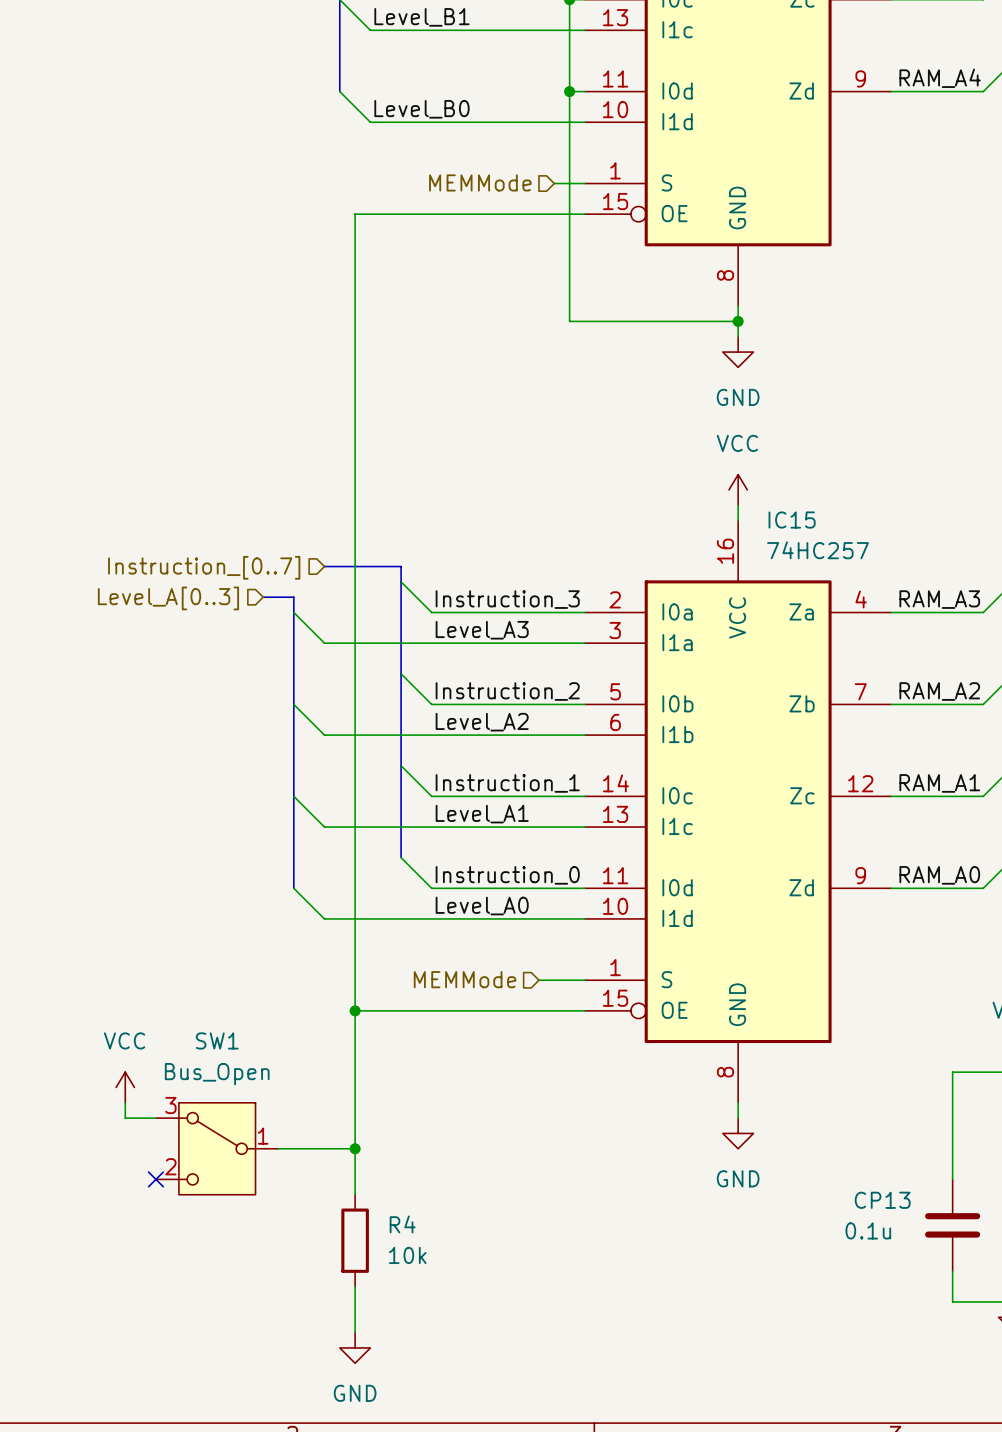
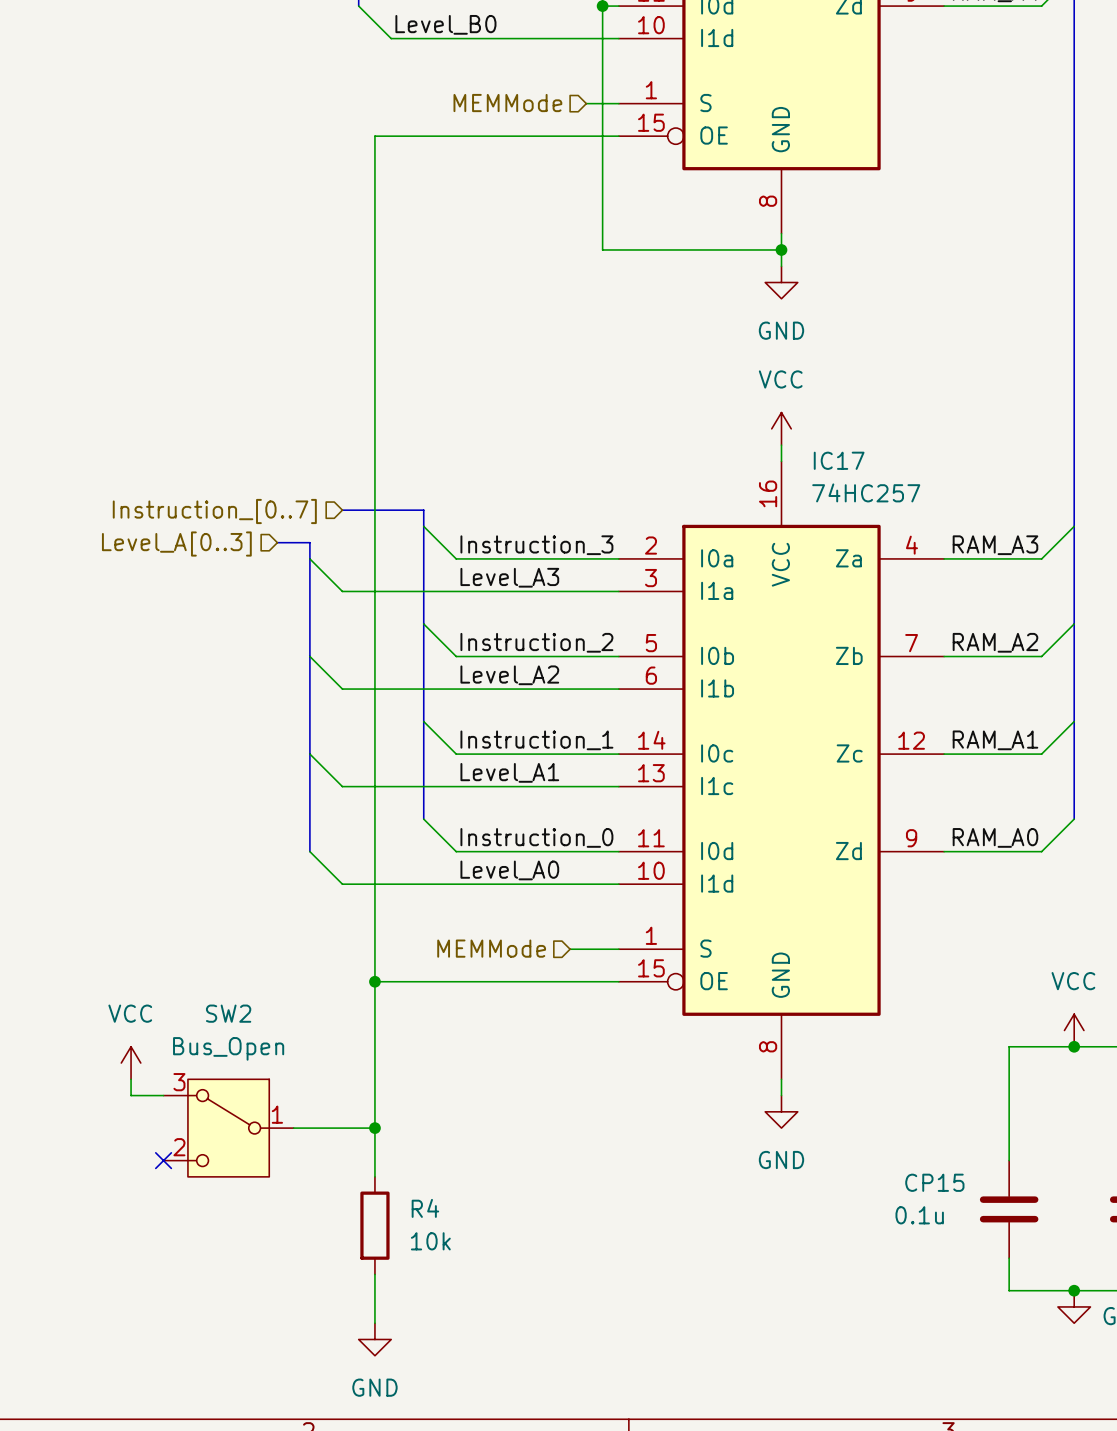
IC15 name: IC15 (792, 520) -> IC17 (839, 460)
SW1 name: SW1 (217, 1040) -> SW2 (228, 1013)
CP13 name: CP13 (882, 1200) -> CP15 (934, 1182)

